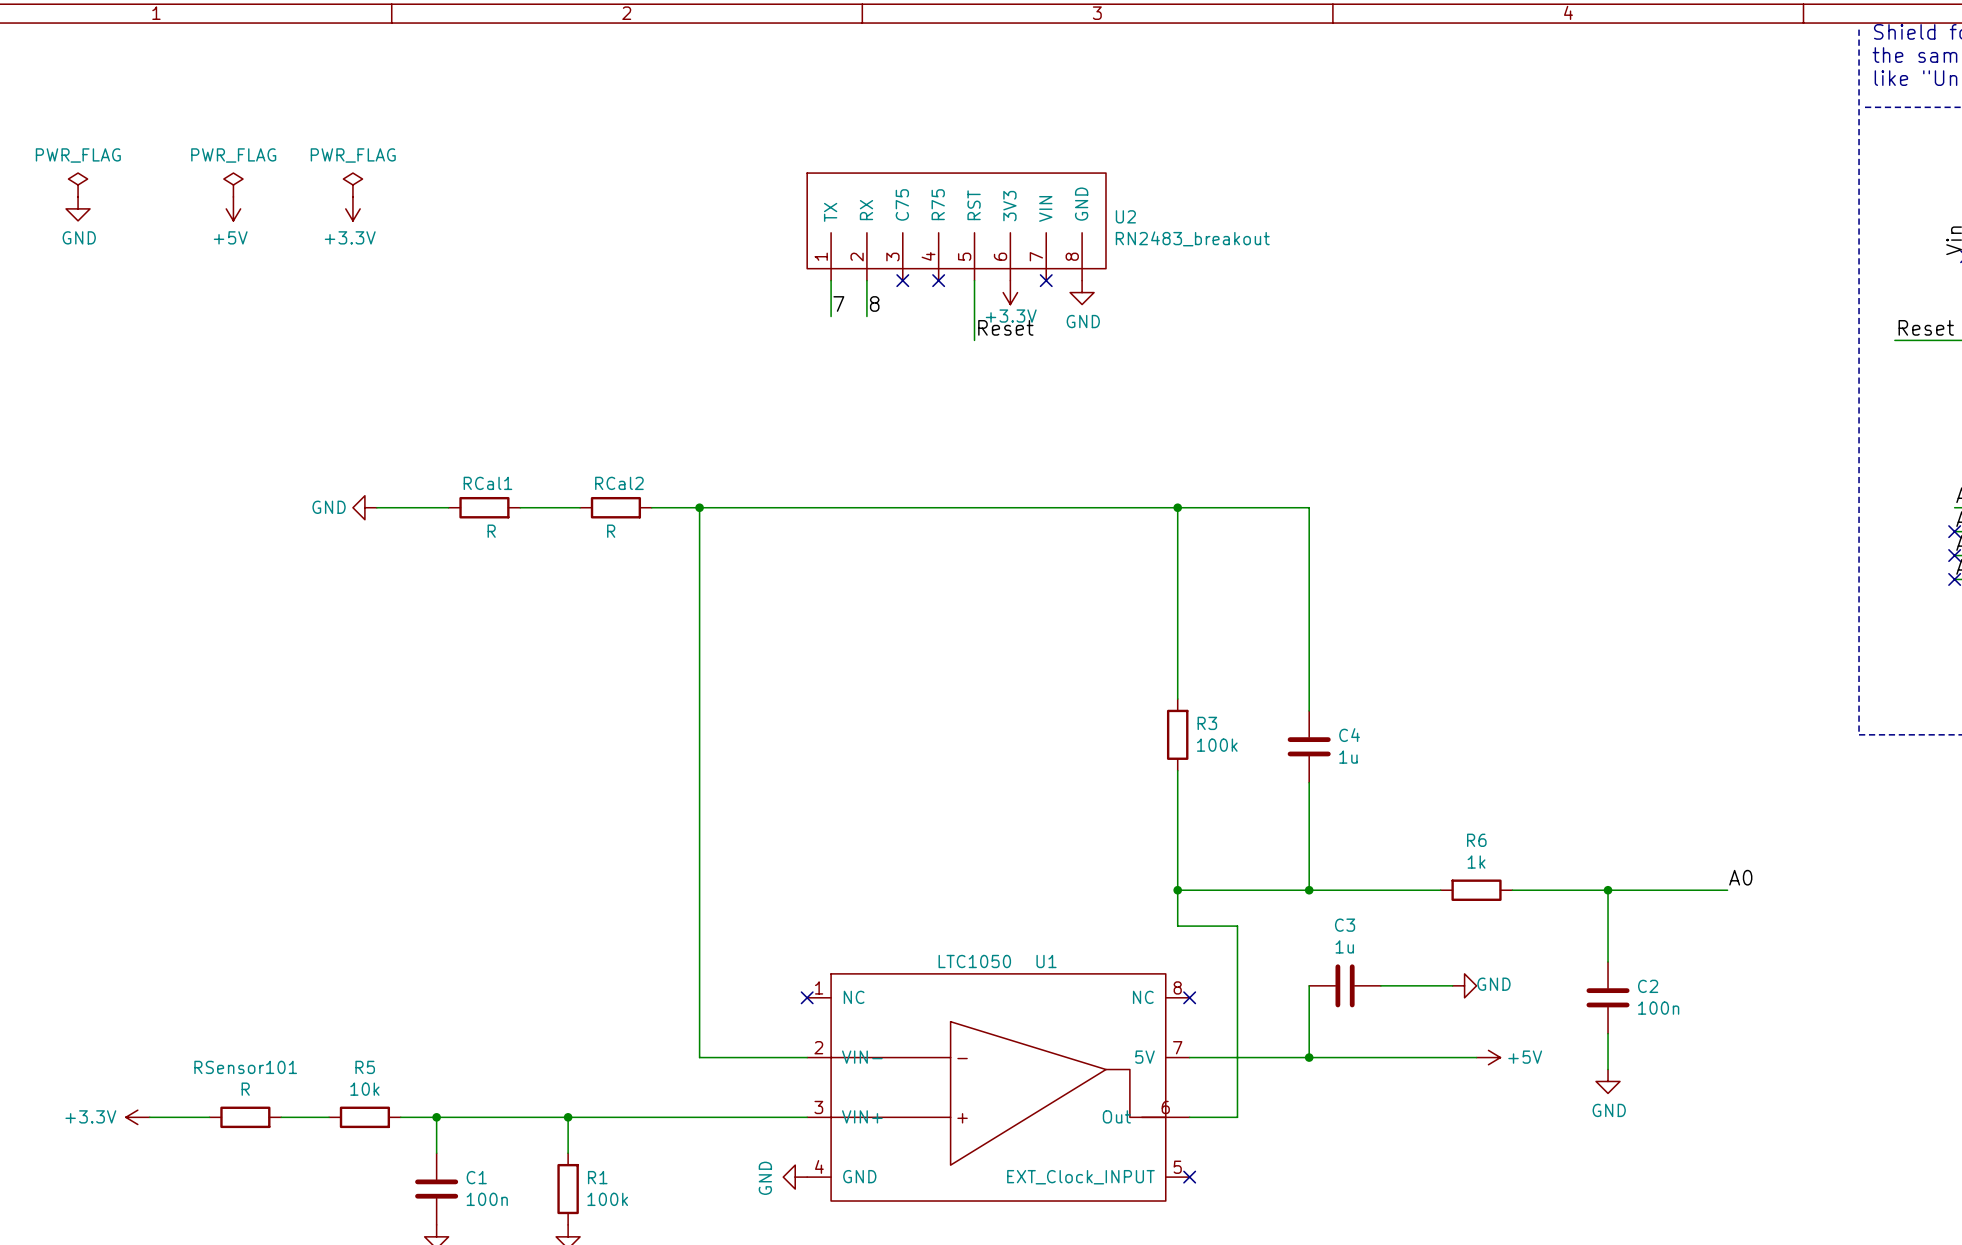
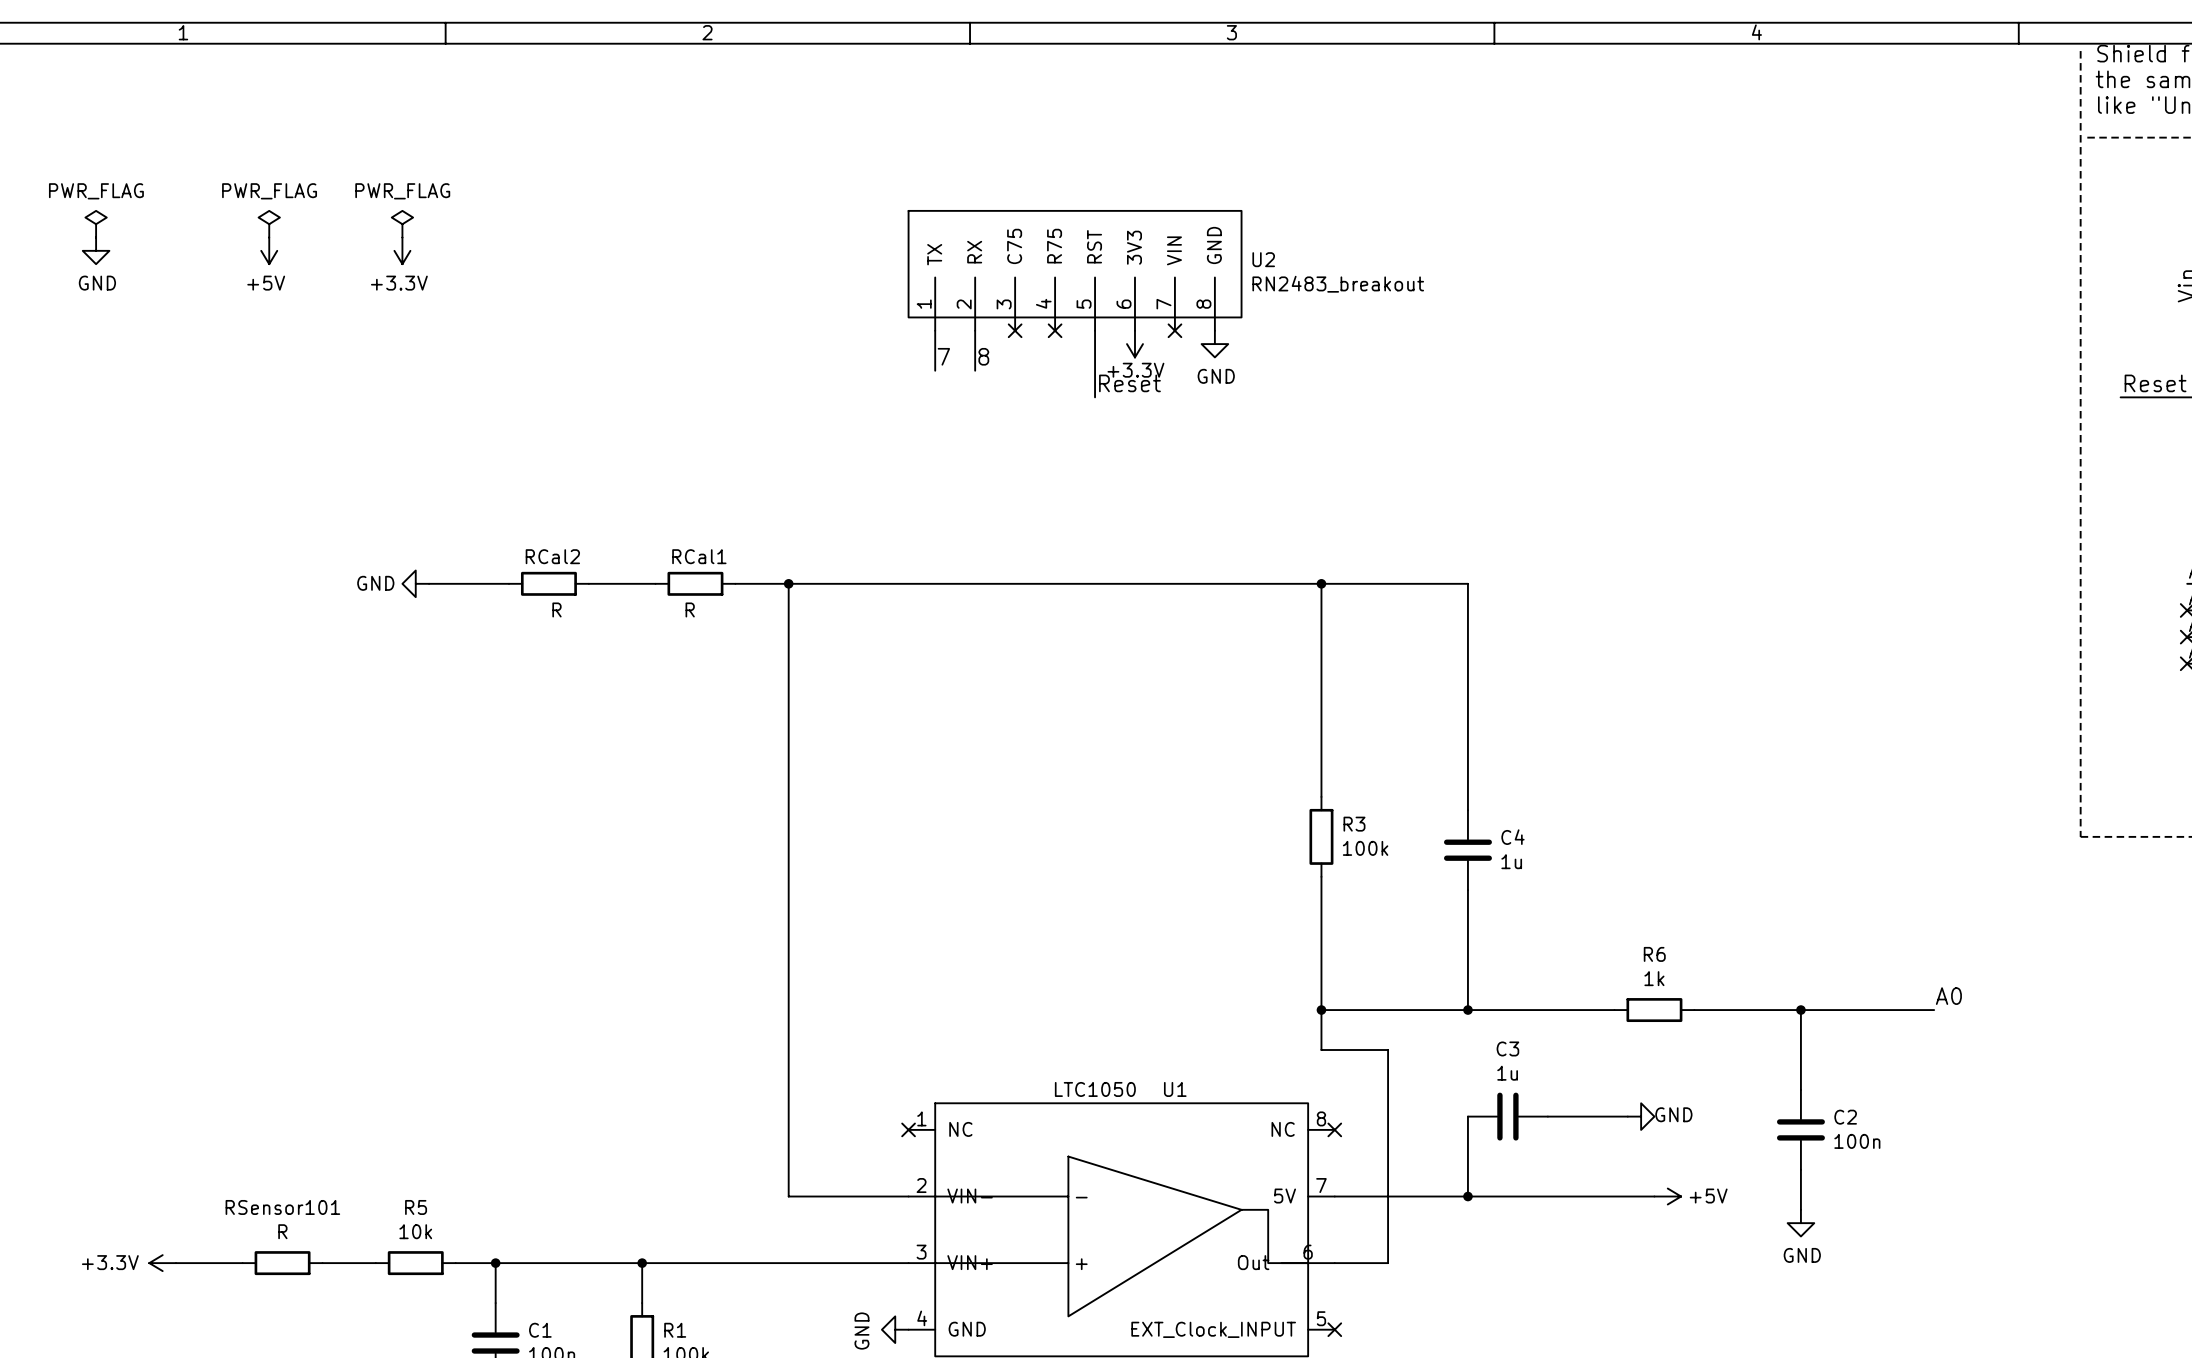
RCal1 name: RCal1 (487, 483) -> RCal2 (552, 556)
RCal2 name: RCal2 (619, 483) -> RCal1 (699, 556)

